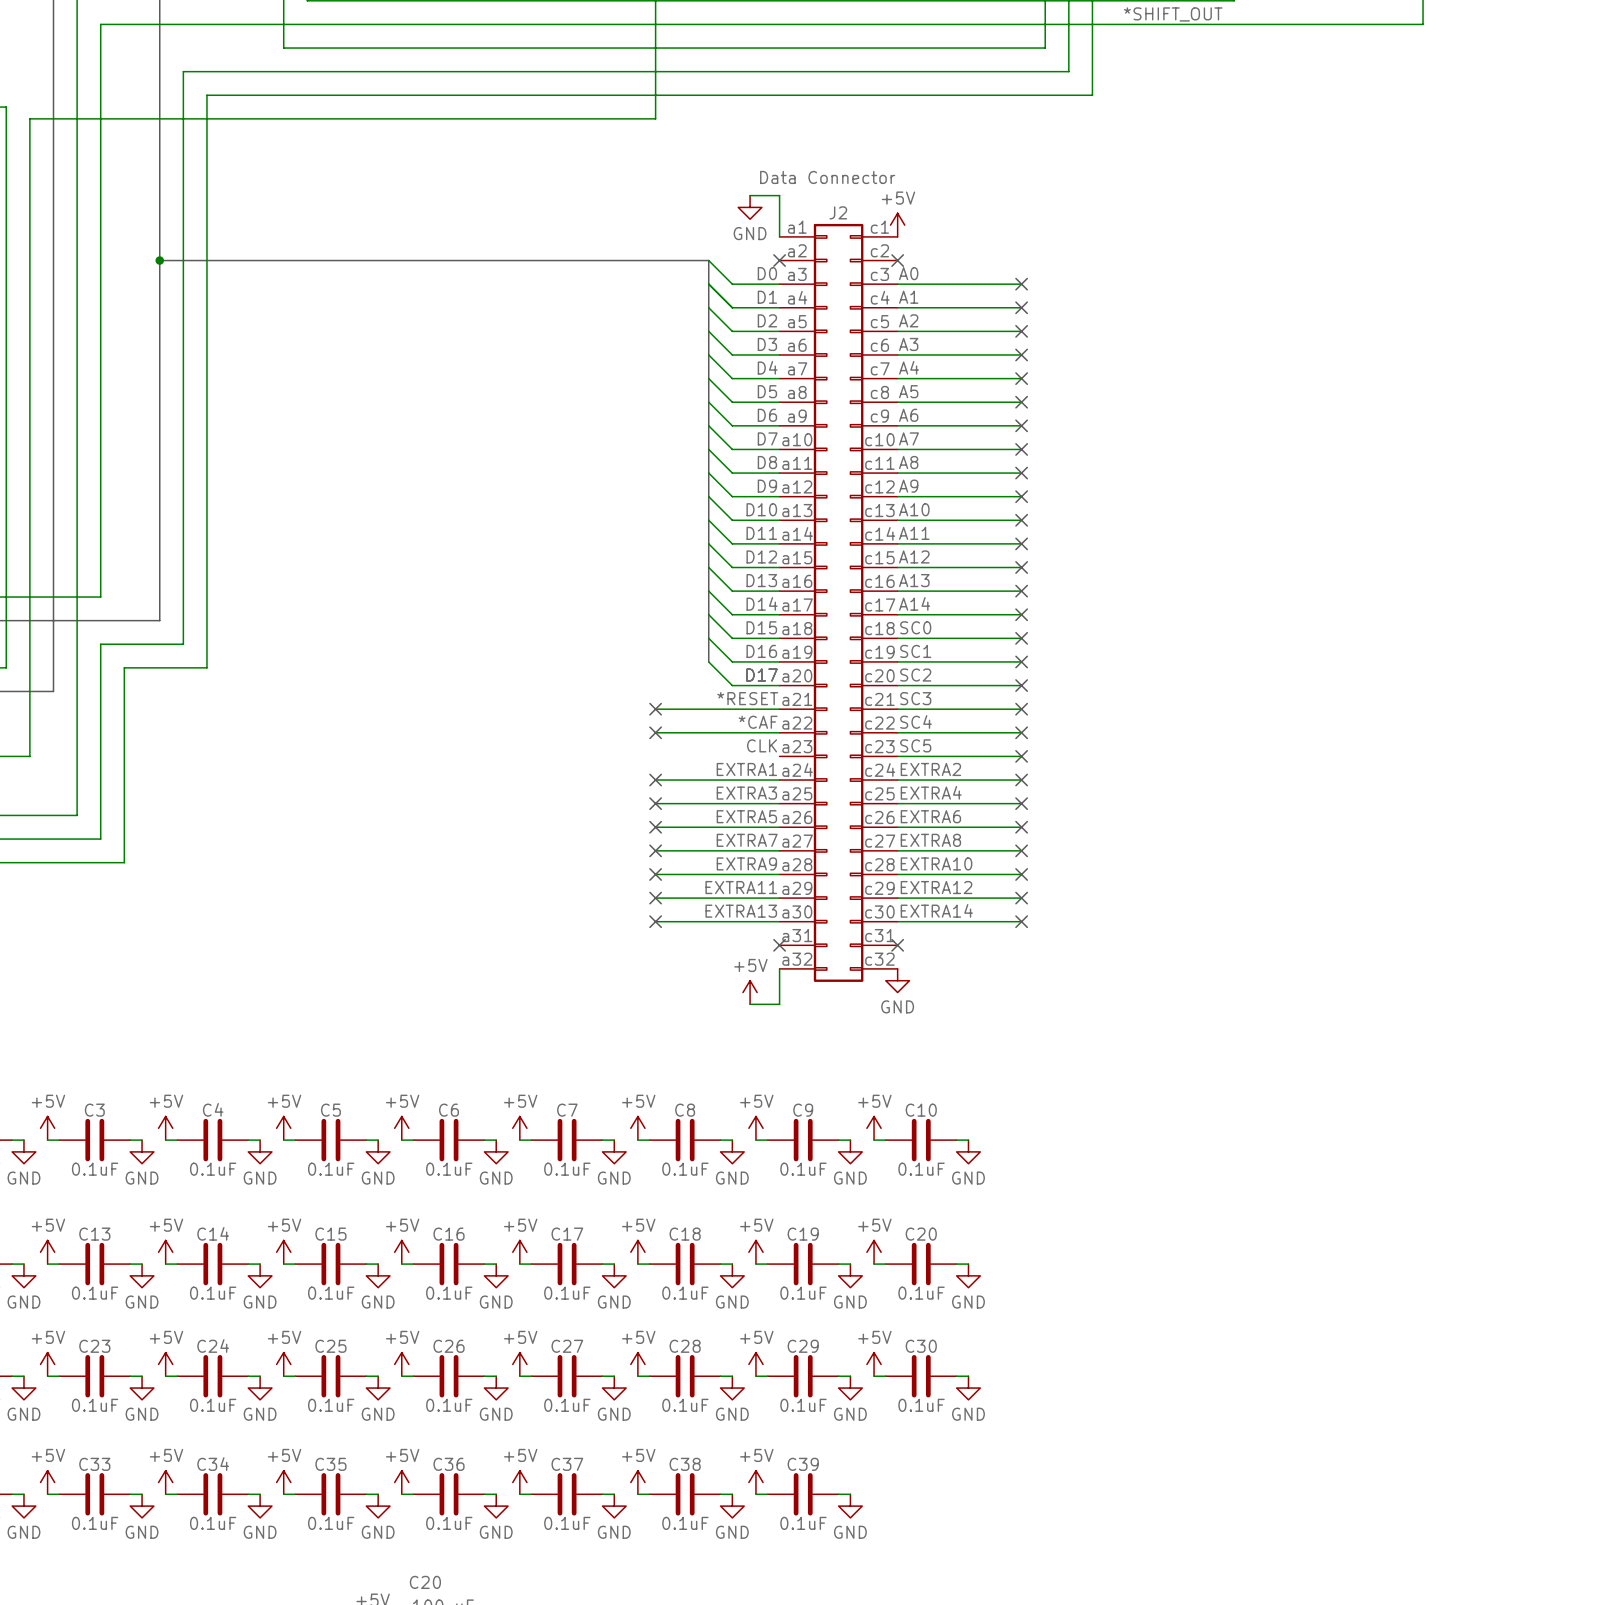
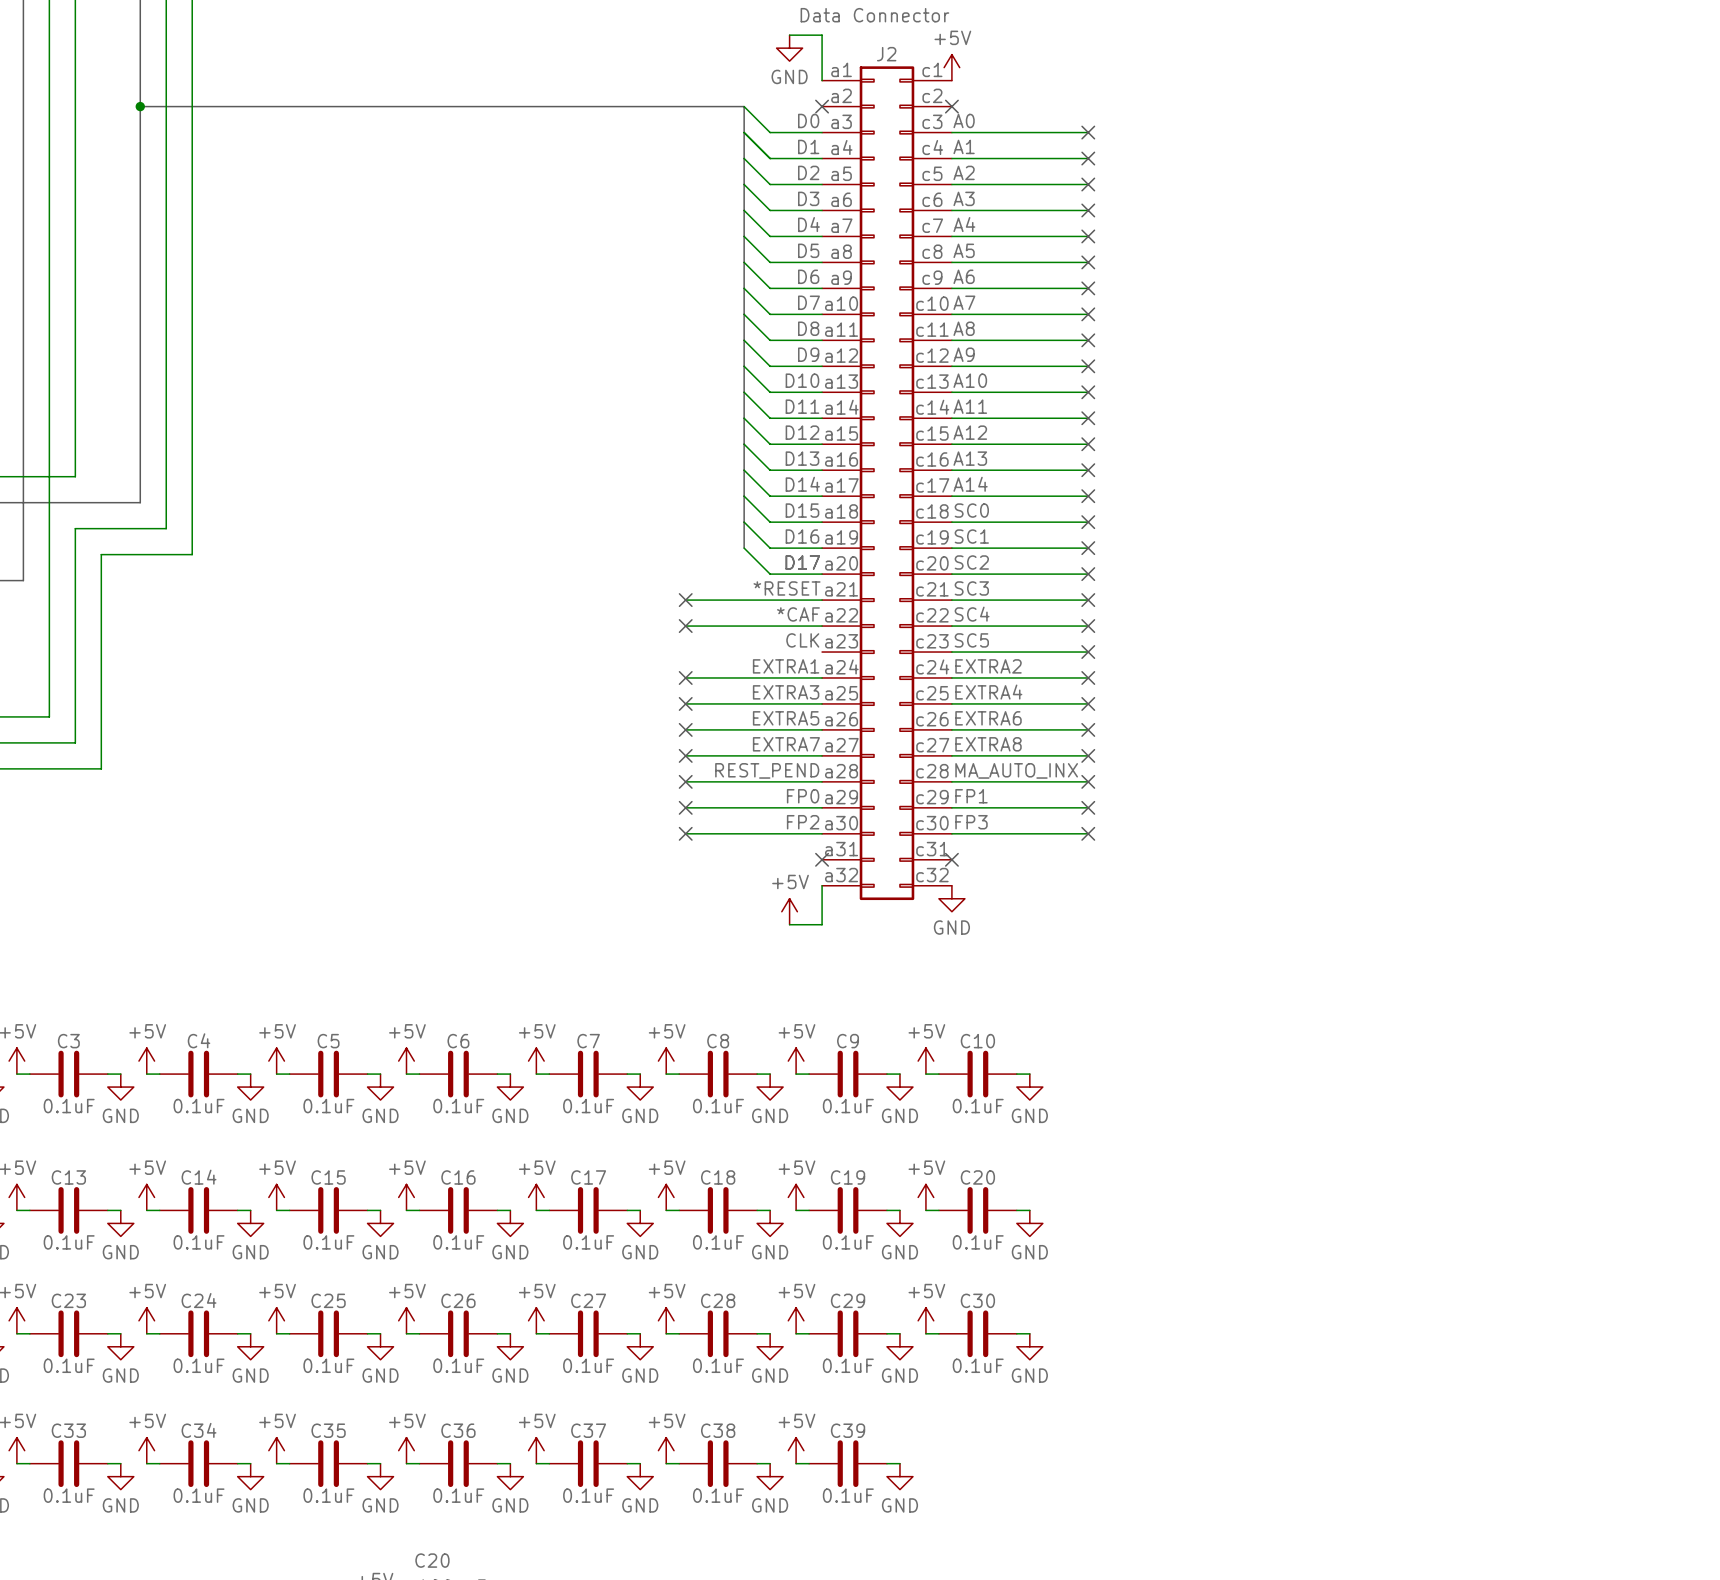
label: EXTRA9 (746, 863) -> REST_PEND (767, 770)
label: EXTRA10 (936, 863) -> MA_AUTO_INX (1016, 770)
label: EXTRA11 (741, 887) -> FP0 (803, 796)
label: EXTRA12 (936, 887) -> FP1 (971, 796)
label: EXTRA14 (936, 910) -> FP3 (971, 822)
label: EXTRA13 (741, 911) -> FP2 (803, 822)

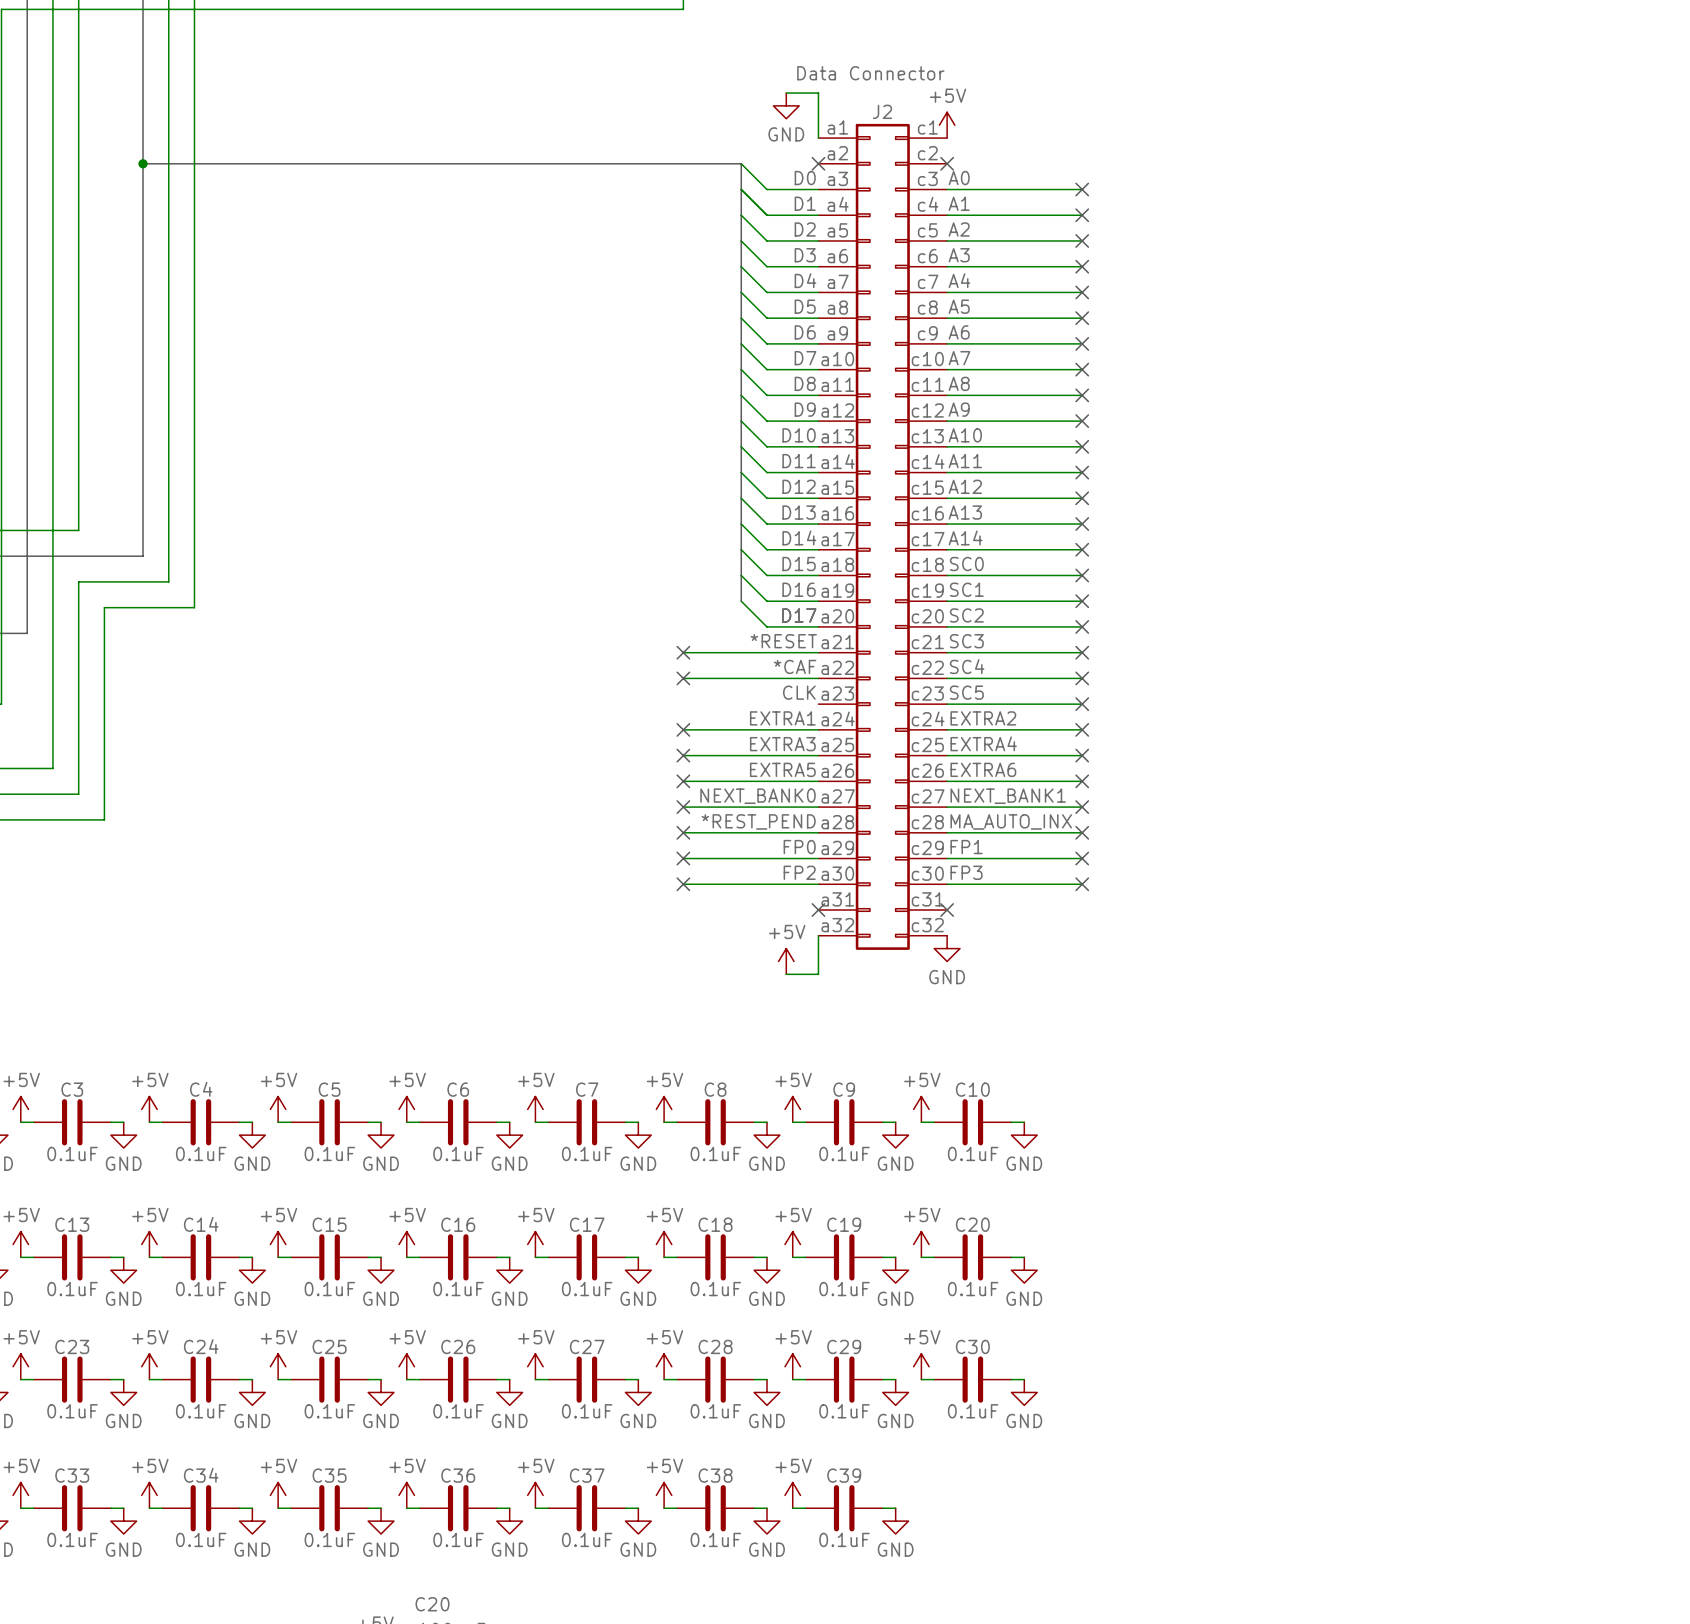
label: EXTRA7 (786, 744) -> NEXT_BANK0 (758, 796)
label: EXTRA8 (988, 744) -> NEXT_BANK1 (1008, 796)
label: REST_PEND (767, 770) -> *REST_PEND (758, 821)

